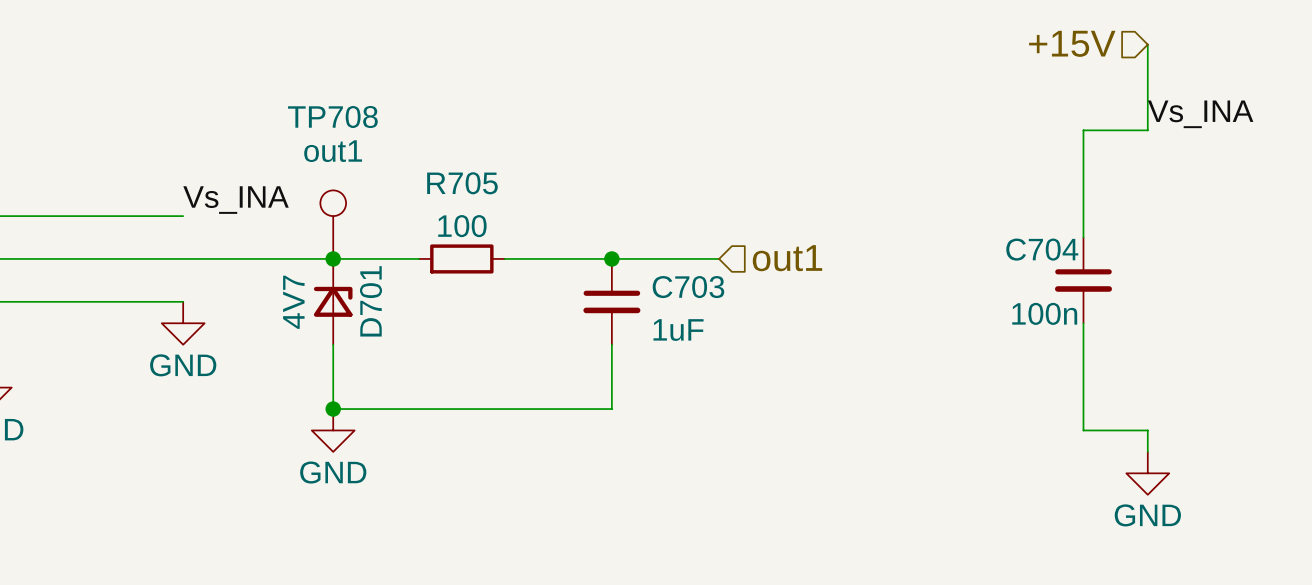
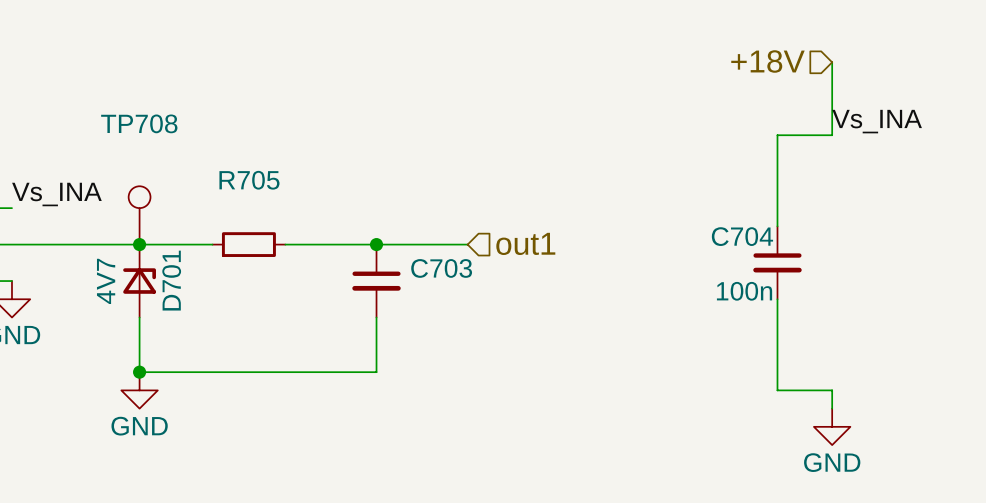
hierarchical label: +15V (1072, 43) -> +18V (767, 61)
TP708 value: out1 (333, 151) -> none
R705 value: 100 (462, 226) -> none
C703 value: 1uF (678, 330) -> none

